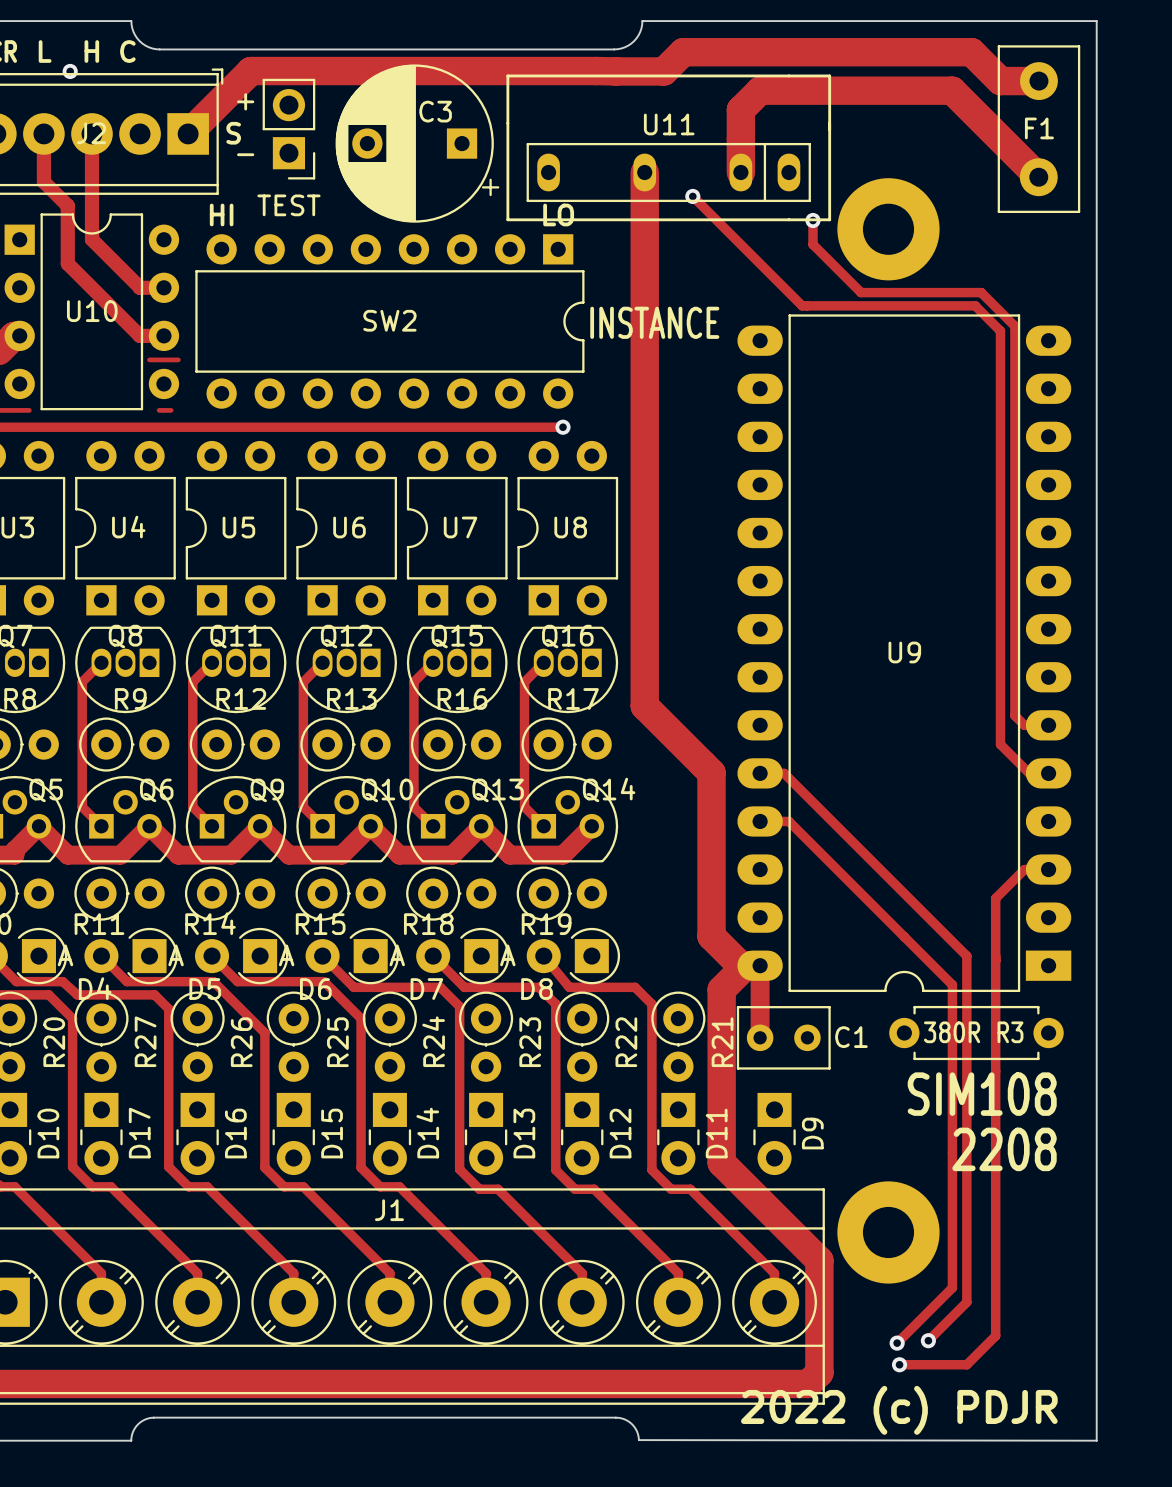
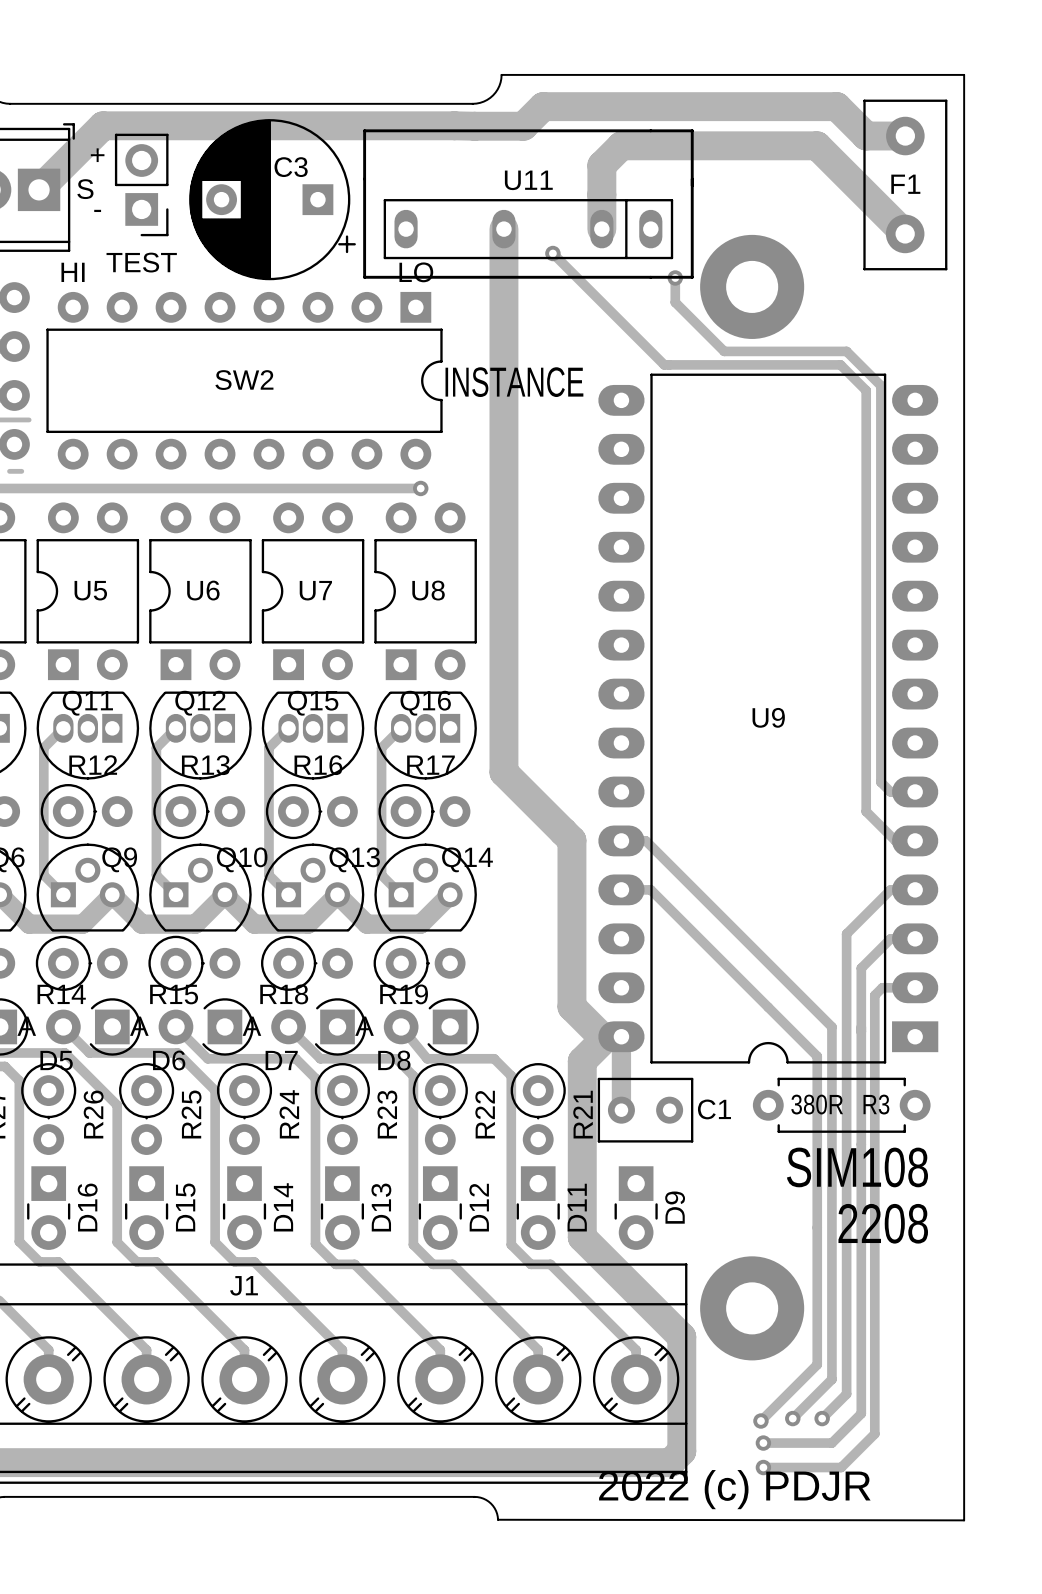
track: none -> (915, 889) (890, 889) (846, 933) (846, 1394) (822, 1418)
track: none -> (915, 987) (882, 987) (874, 995) (874, 1433) (841, 1467) (763, 1467)
via: none -> (822, 1418)
via: none -> (763, 1467)

